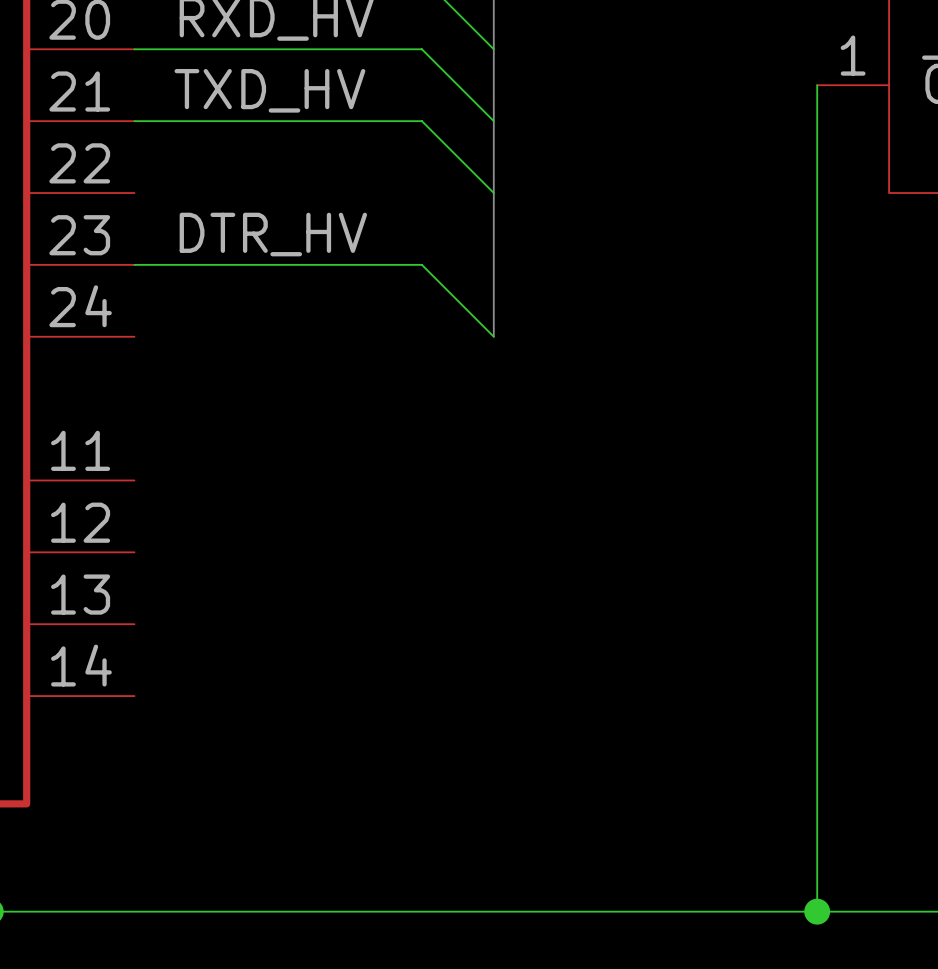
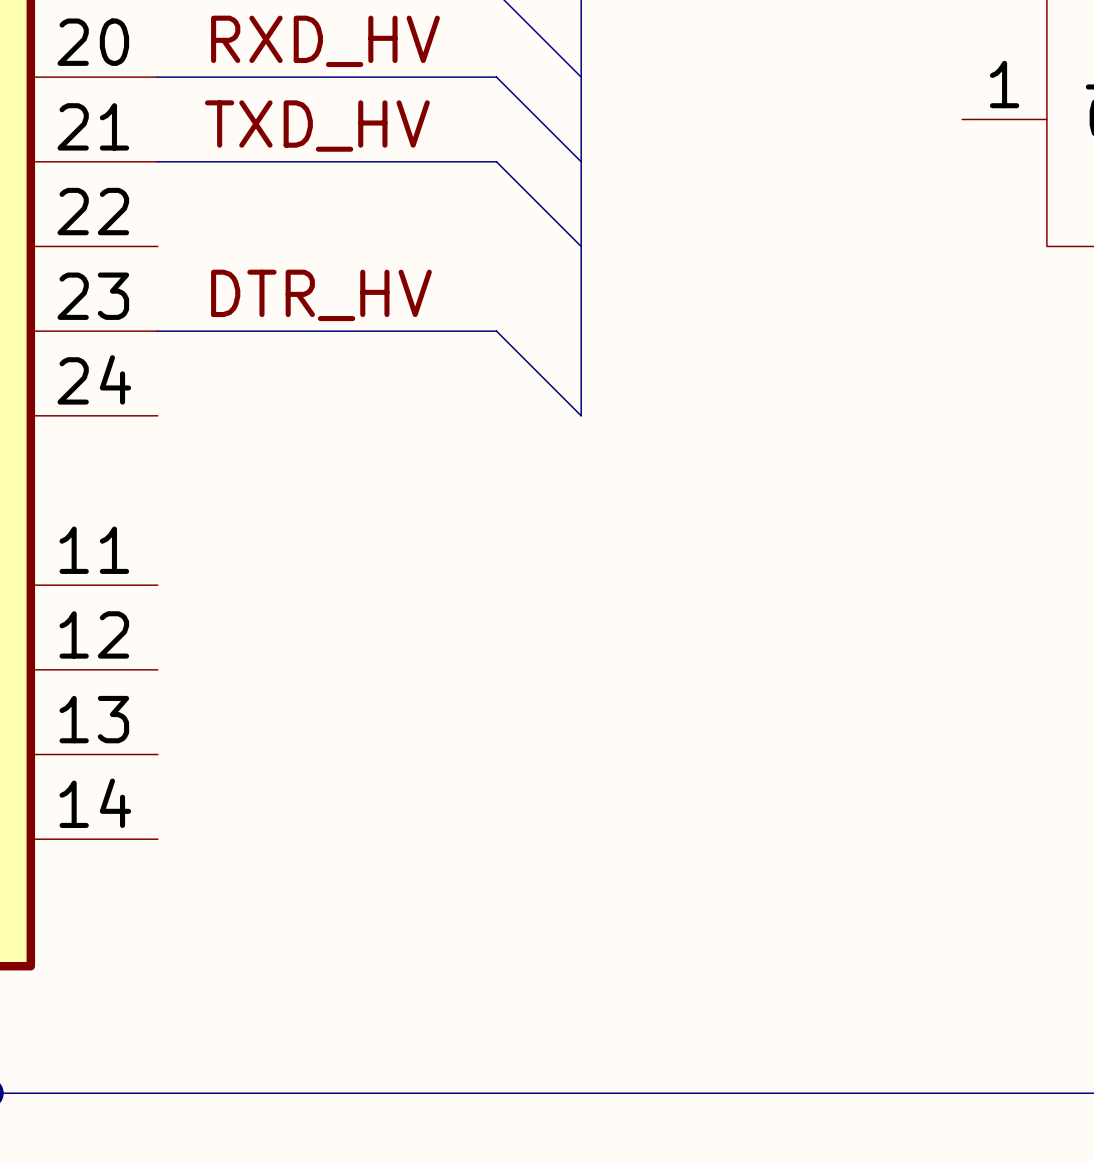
wire: (817, 85) (817, 911) -> none
junction: (817, 911) -> none

